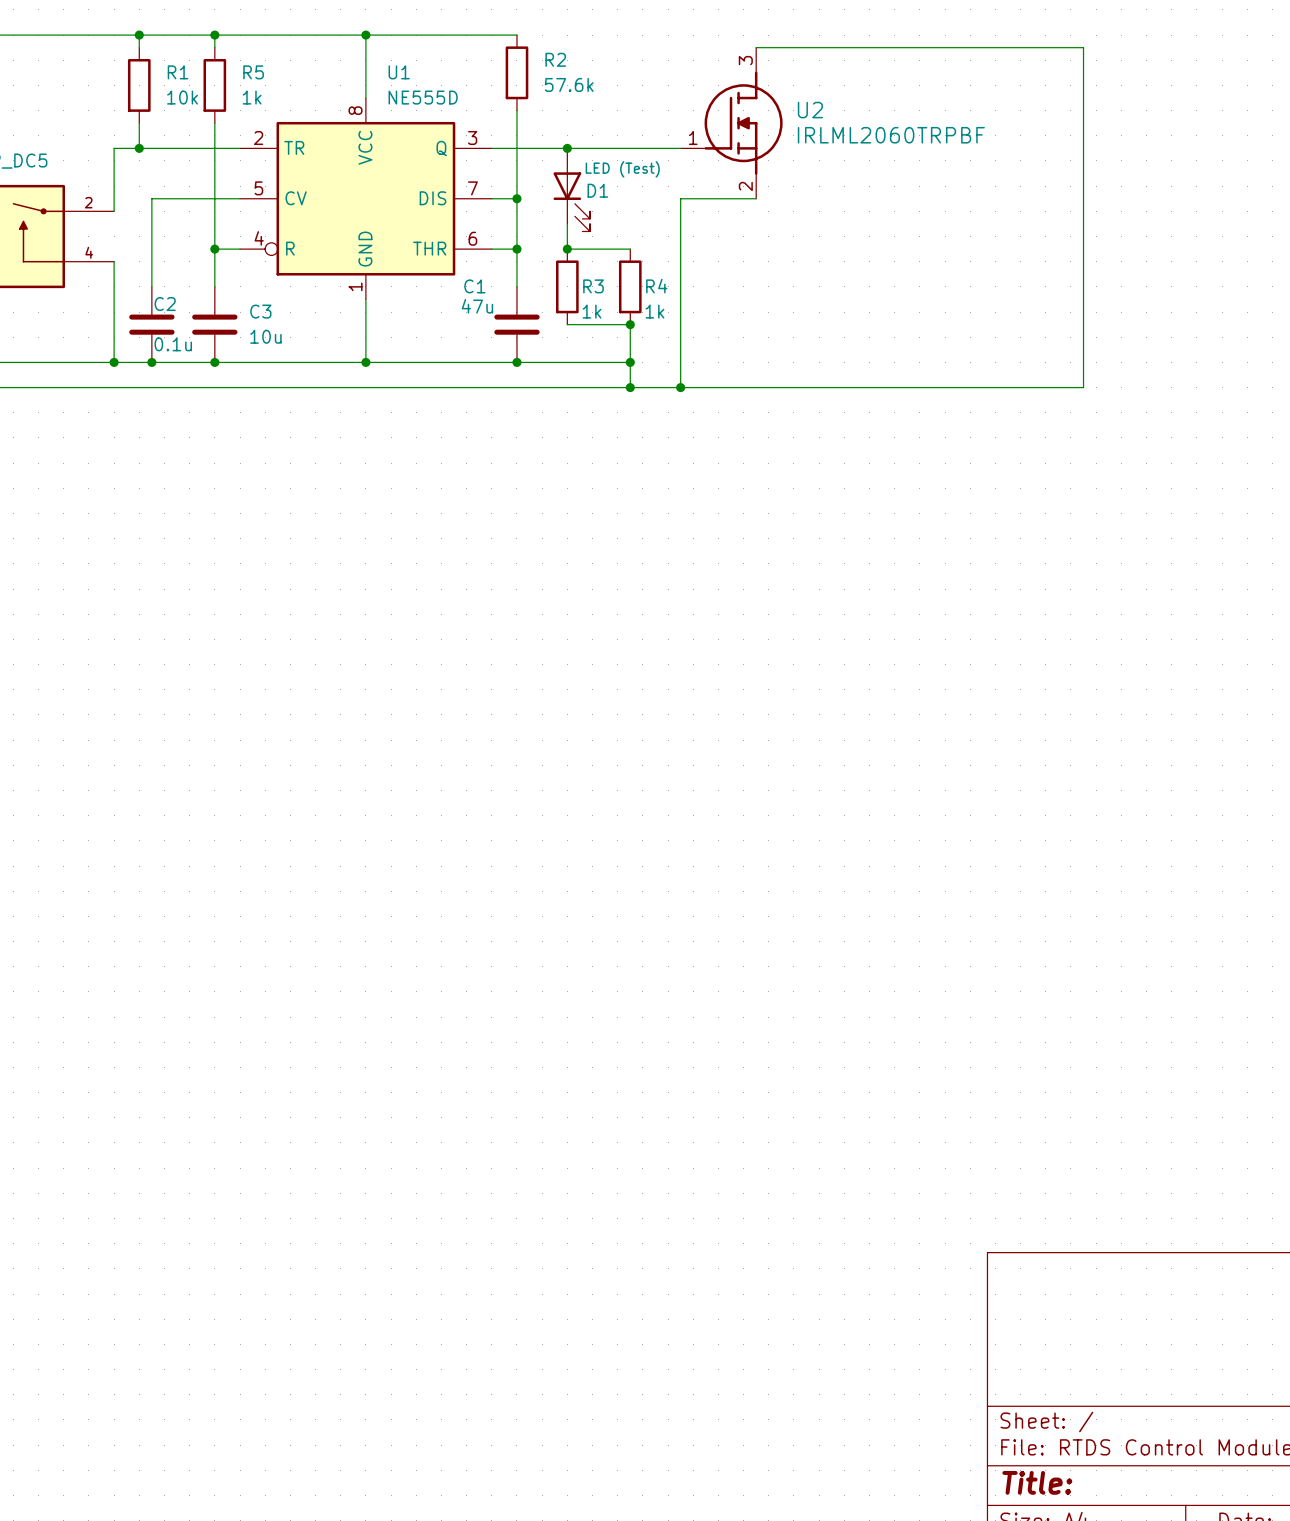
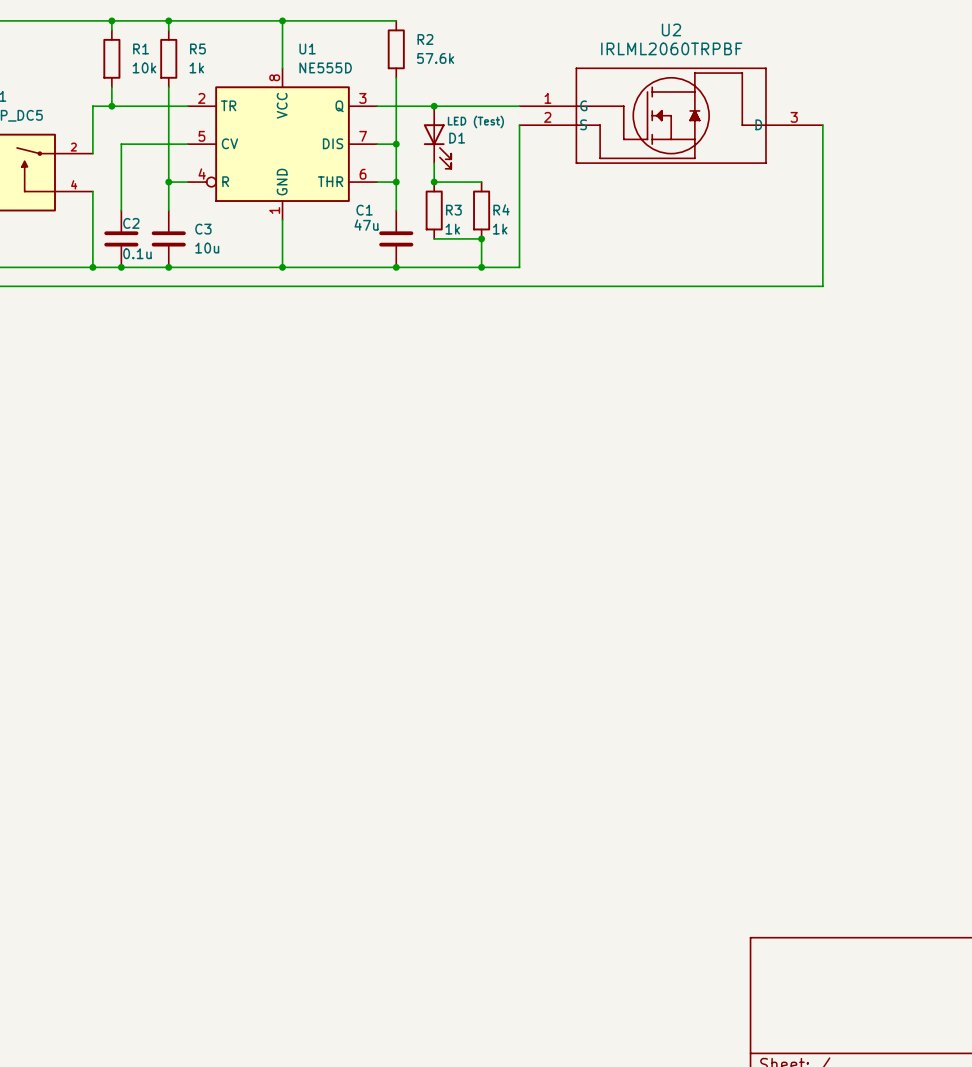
U2 symbol: [680, 47, 783, 199] -> [519, 67, 823, 164]
wire: (756, 47) (1083, 47) (1083, 173) -> none
U2 name position: U2 (810, 110) -> U2 (671, 29)
U2 value position: IRLML2060TRPBF (891, 135) -> IRLML2060TRPBF (671, 48)
wire: (680, 198) (756, 198) -> (519, 144) (519, 125)
wire: (630, 362) (630, 387) -> (481, 267) (519, 267)
wire: (680, 362) (680, 387) -> none
junction: (630, 387) -> none
junction: (680, 387) -> none

